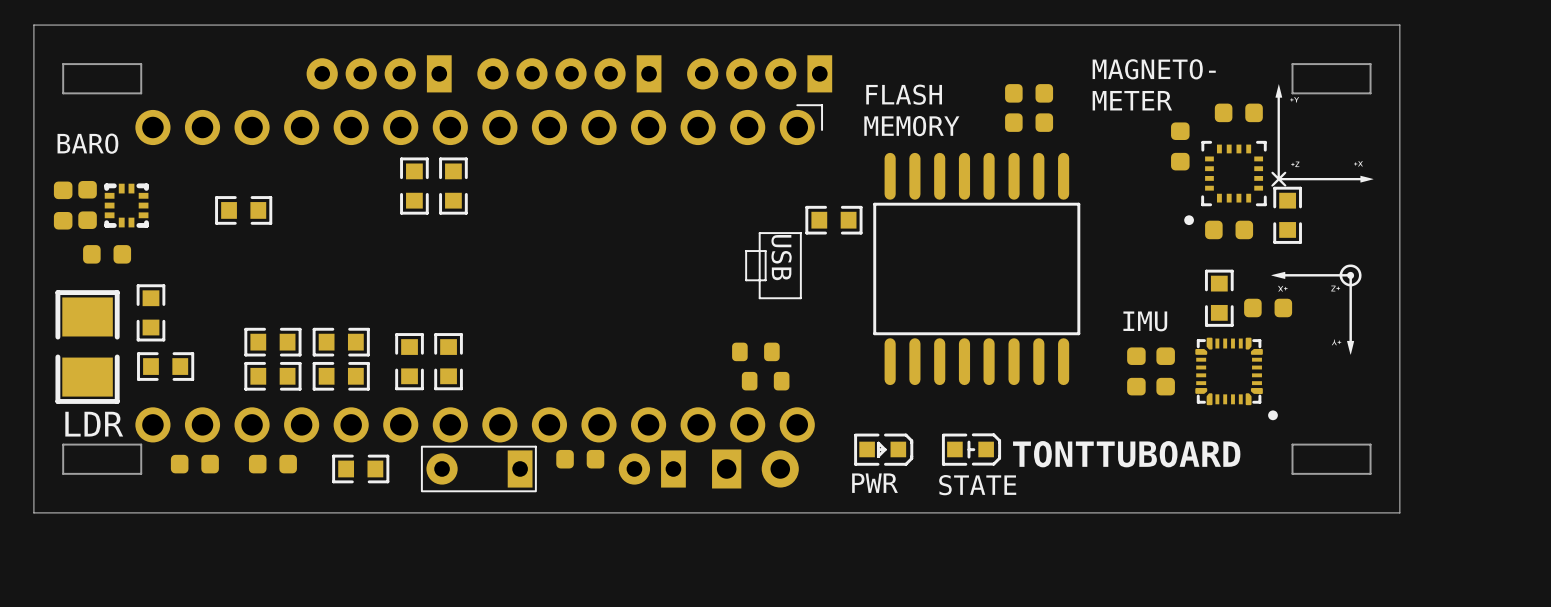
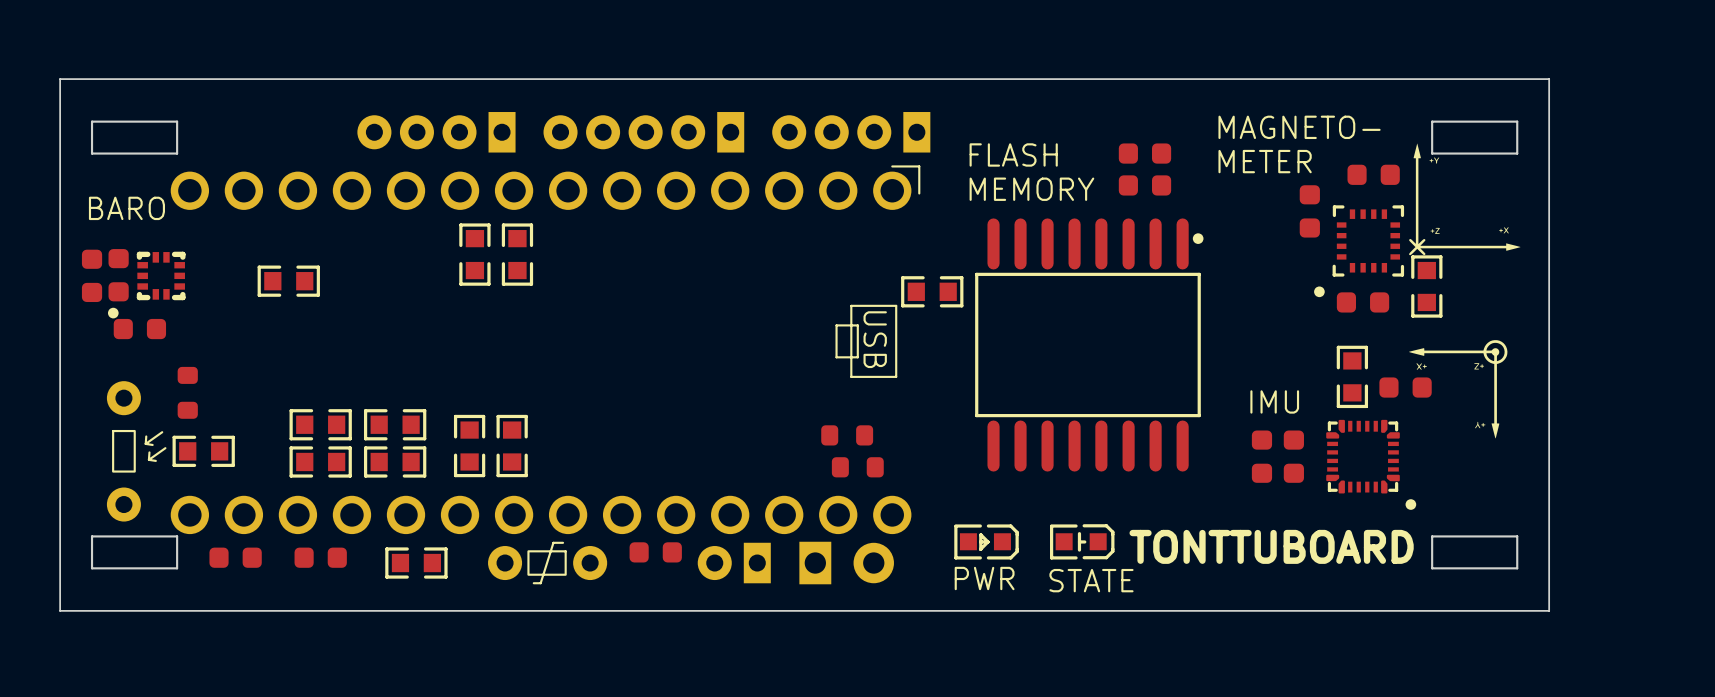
drawing: none -> [1192, 233, 1204, 244]
drawing: none -> [107, 307, 119, 319]
part footprint: [136, 284, 166, 342] -> [177, 366, 198, 419]
part: (87, 347) -> none
part: none -> (136, 451)
part footprint: [420, 445, 537, 493] -> [488, 541, 608, 585]

